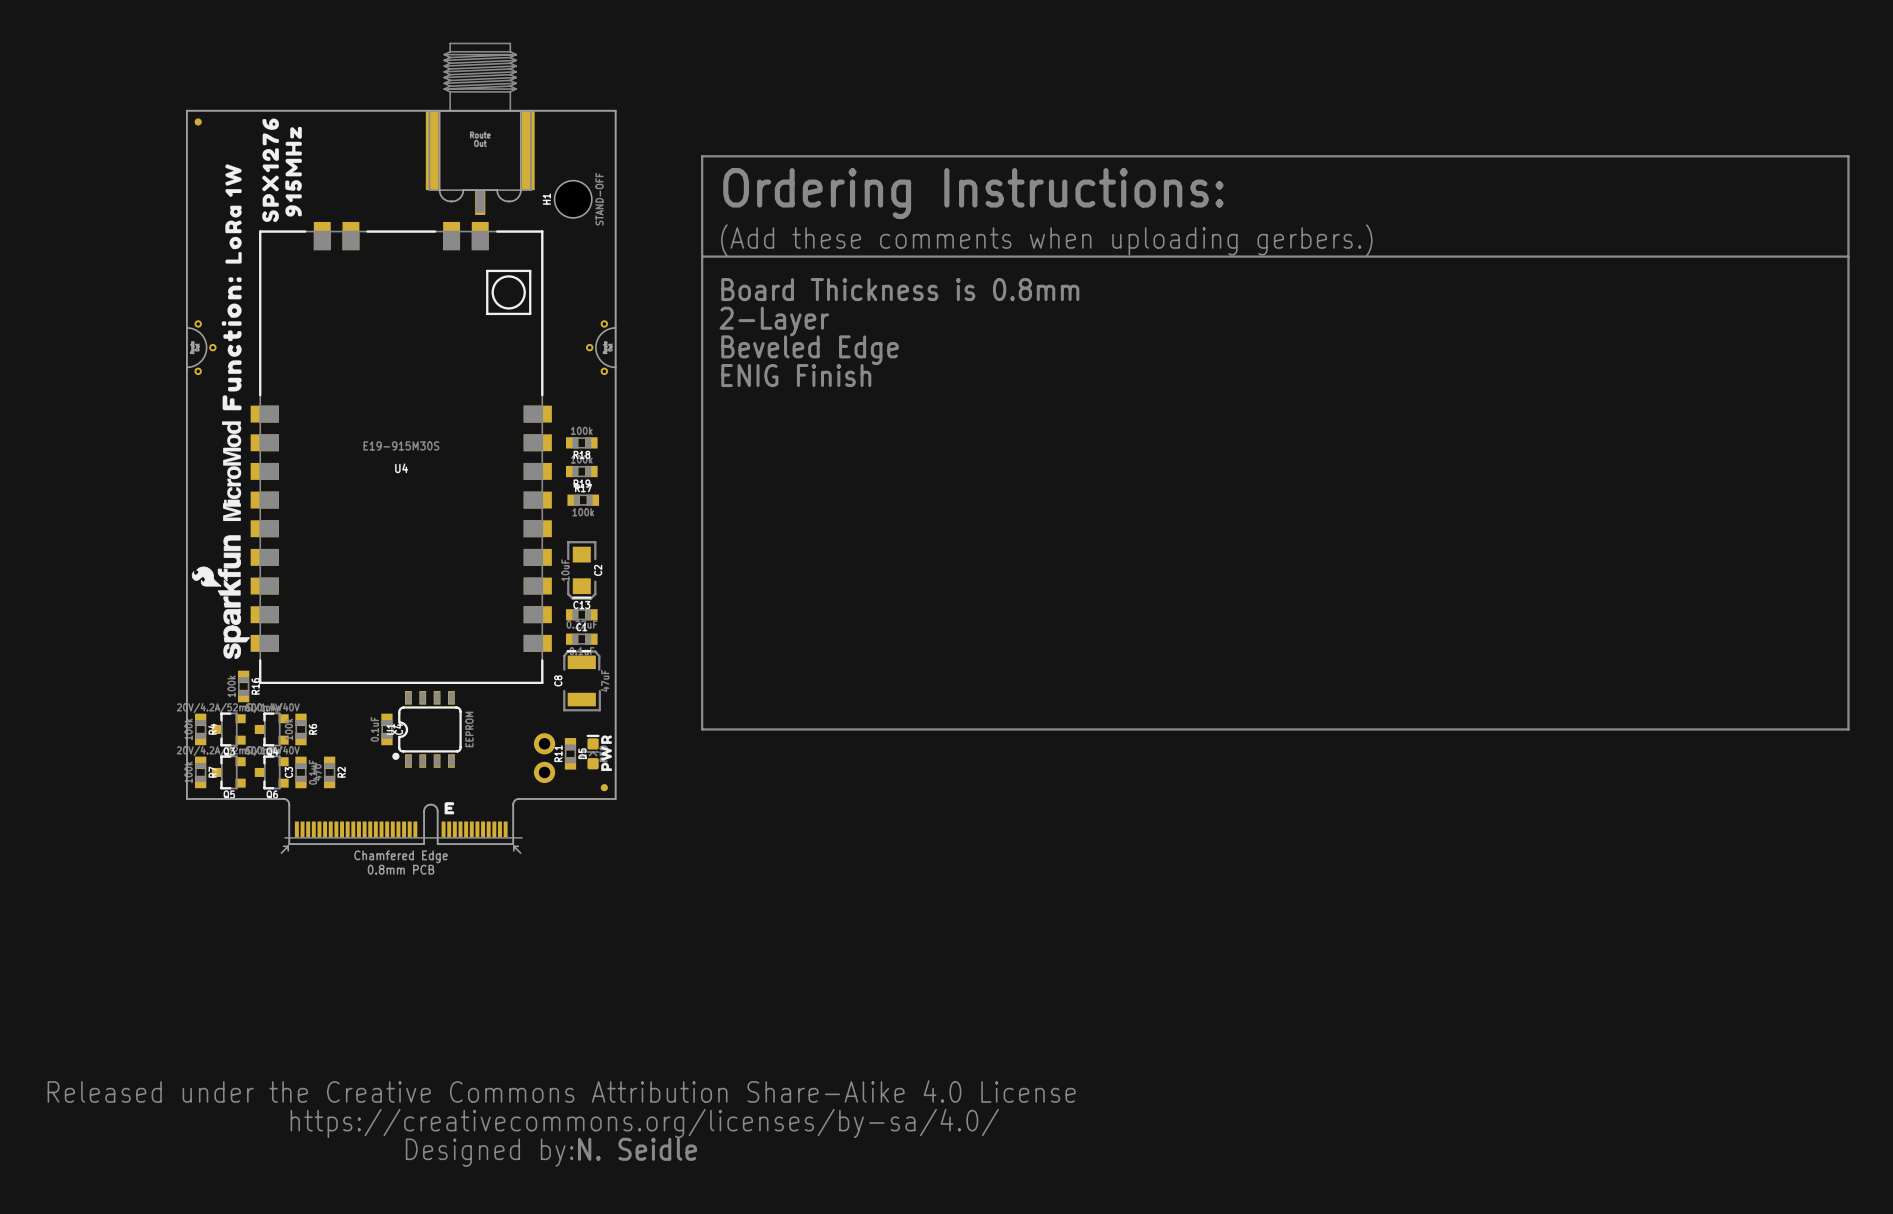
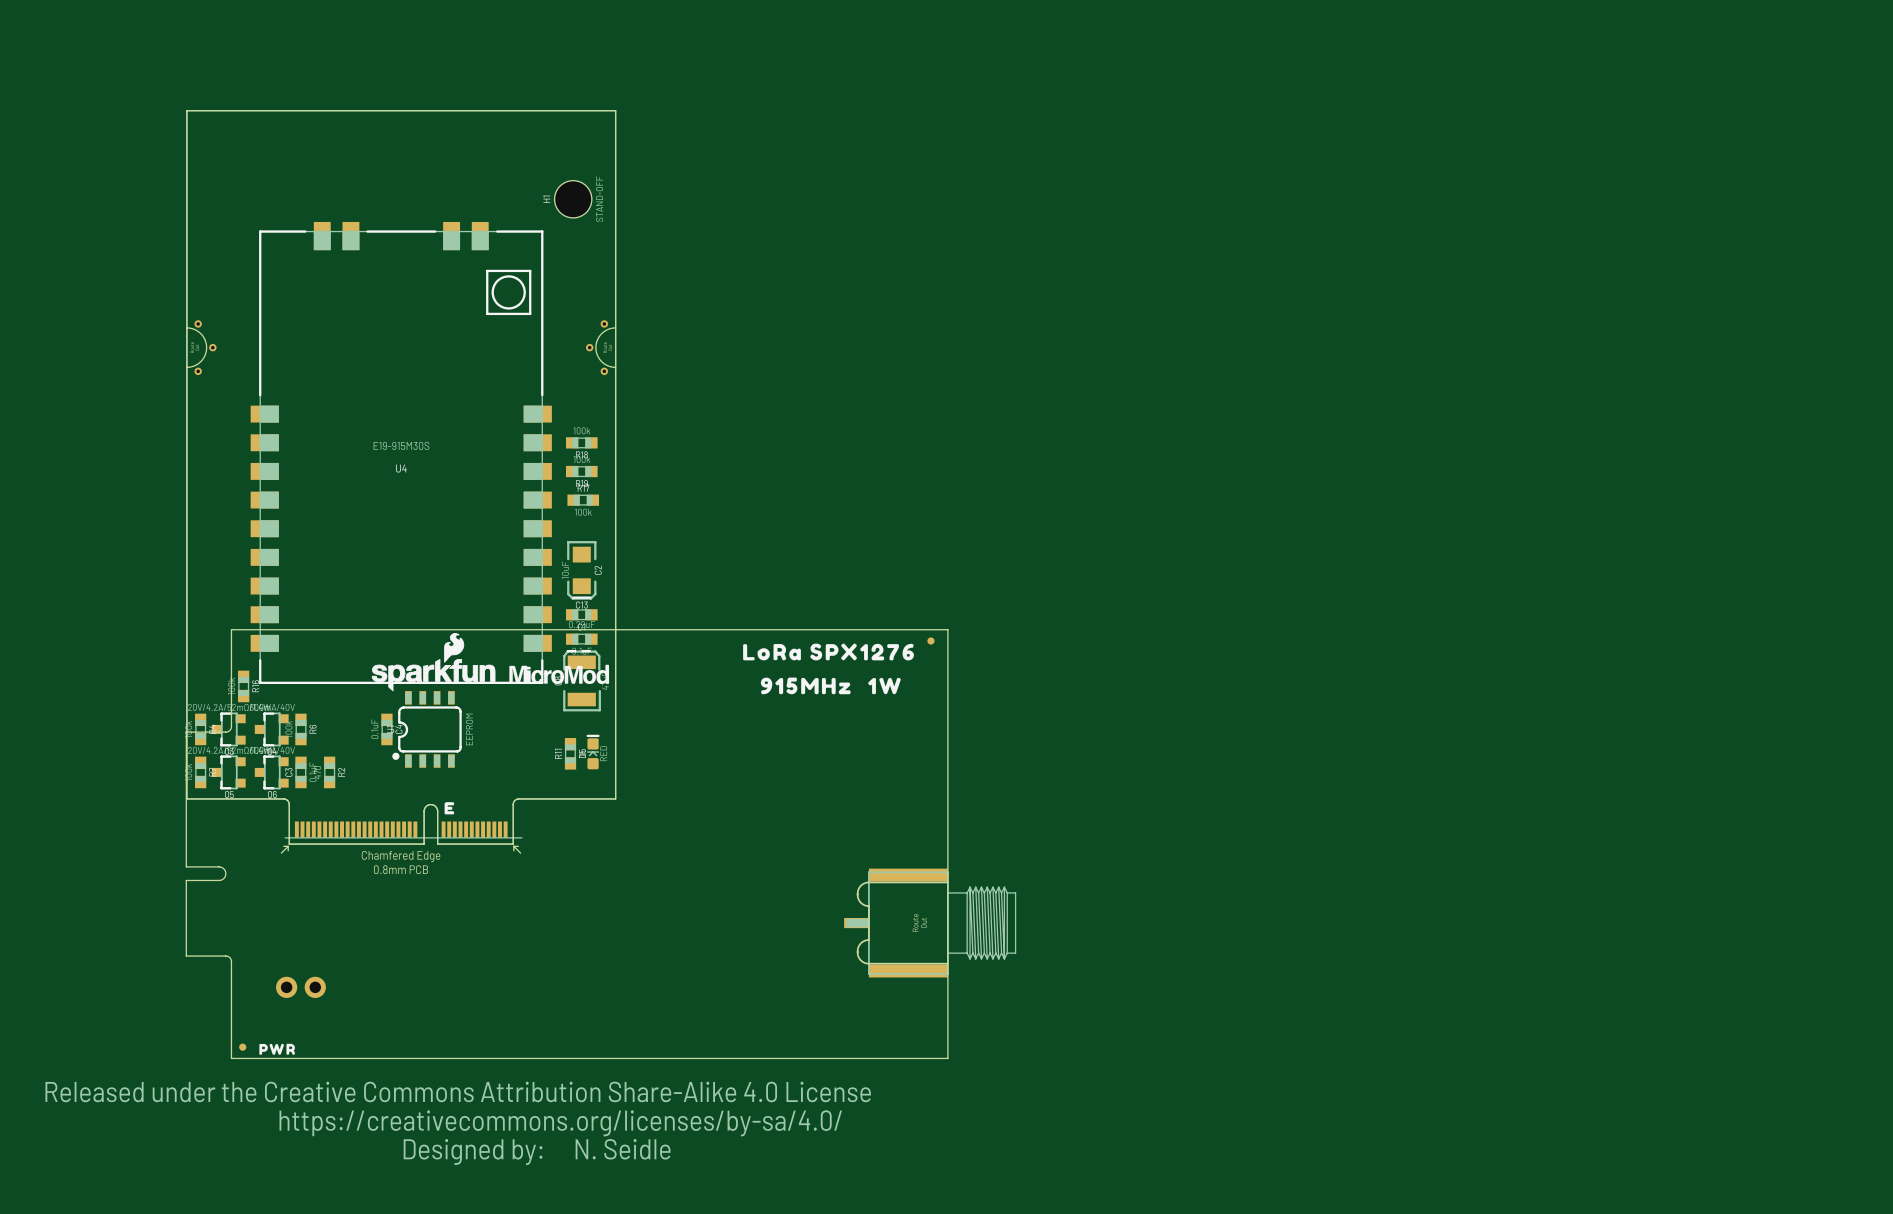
drawing: [262, 118, 302, 223] -> none
part: (198, 122) -> none
part: (480, 129) -> none
drawing: [701, 155, 1850, 731] -> none
drawing: [225, 164, 242, 264] -> none
drawing: [221, 277, 242, 522] -> none
text: Board Thickness is 0.8mm (900, 289) -> none
text: 2-Layer (774, 321) -> none
text: Beveled Edge (810, 350) -> none
text: ENIG Finish (796, 375) -> none
drawing: [191, 535, 251, 660] -> none
board edge: none -> (231, 629) (230, 728) (226, 732) (186, 732) (186, 866) (219, 866) (224, 869) (225, 873) (224, 878) (219, 880) (186, 880) (186, 956) (226, 956) (230, 959) (231, 1058) (947, 1058) (947, 629) (231, 629)
drawing: none -> [371, 633, 496, 692]
part: none -> (930, 640)
drawing: none -> [743, 643, 914, 661]
drawing: none -> [509, 664, 610, 685]
drawing: none -> [760, 677, 851, 695]
drawing: none -> [868, 677, 901, 695]
drawing: [601, 735, 612, 772] -> none
part: (544, 758) -> none
part: (604, 787) -> none
part: none -> (930, 923)
part: none -> (300, 987)
drawing: none -> [259, 1043, 296, 1055]
part: none -> (242, 1047)

